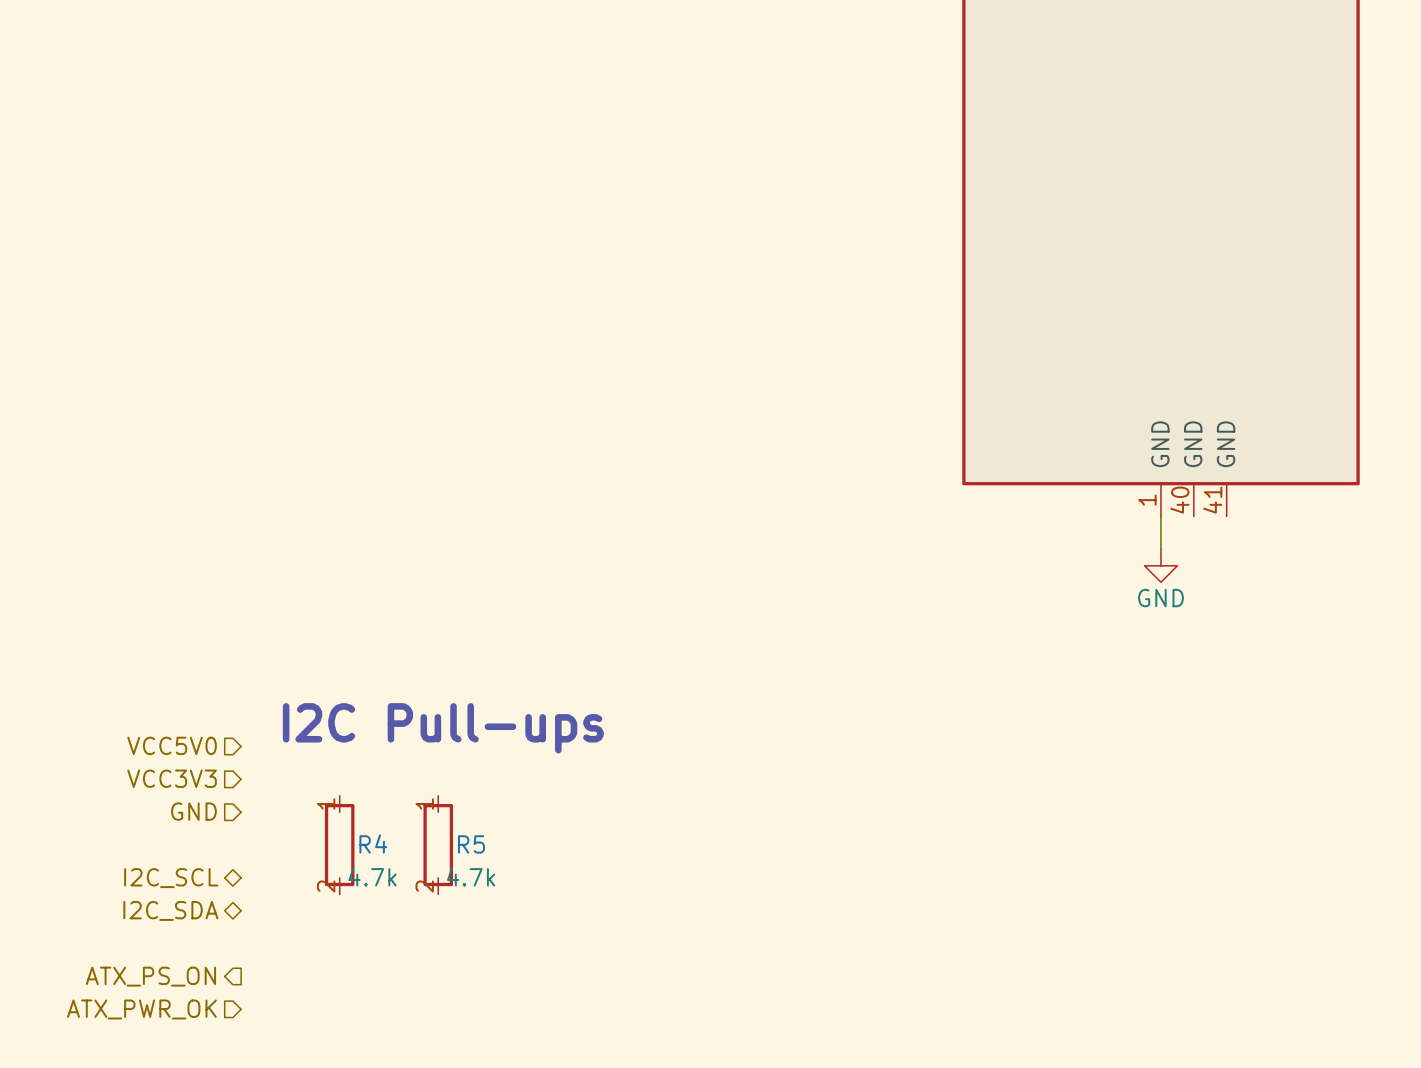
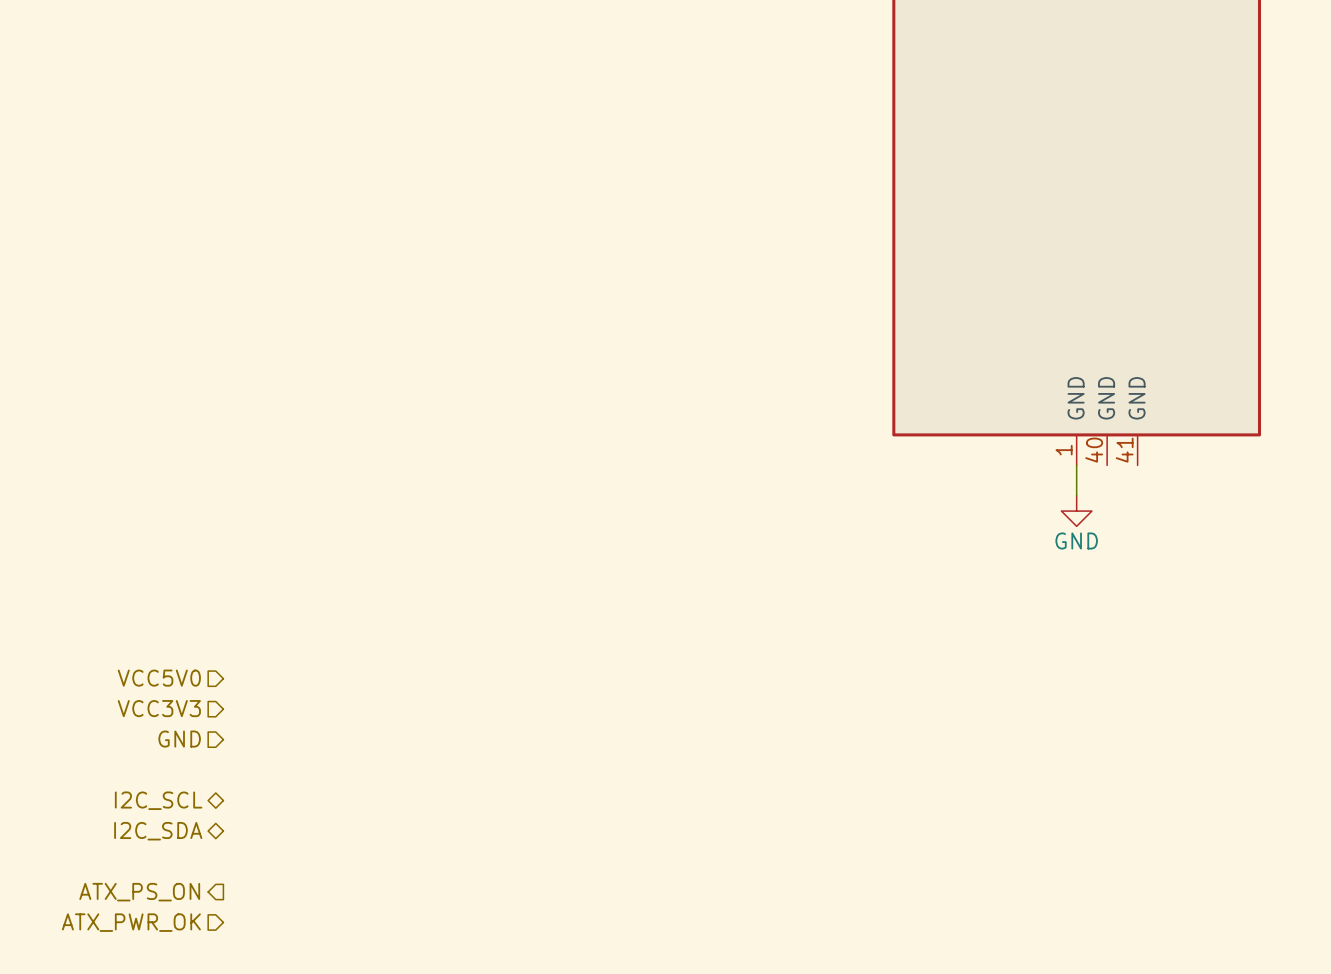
text: I2C Pull-ups (443, 728) -> none
R4: 4.7k (339, 845) -> none
R5: 4.7k (438, 845) -> none

